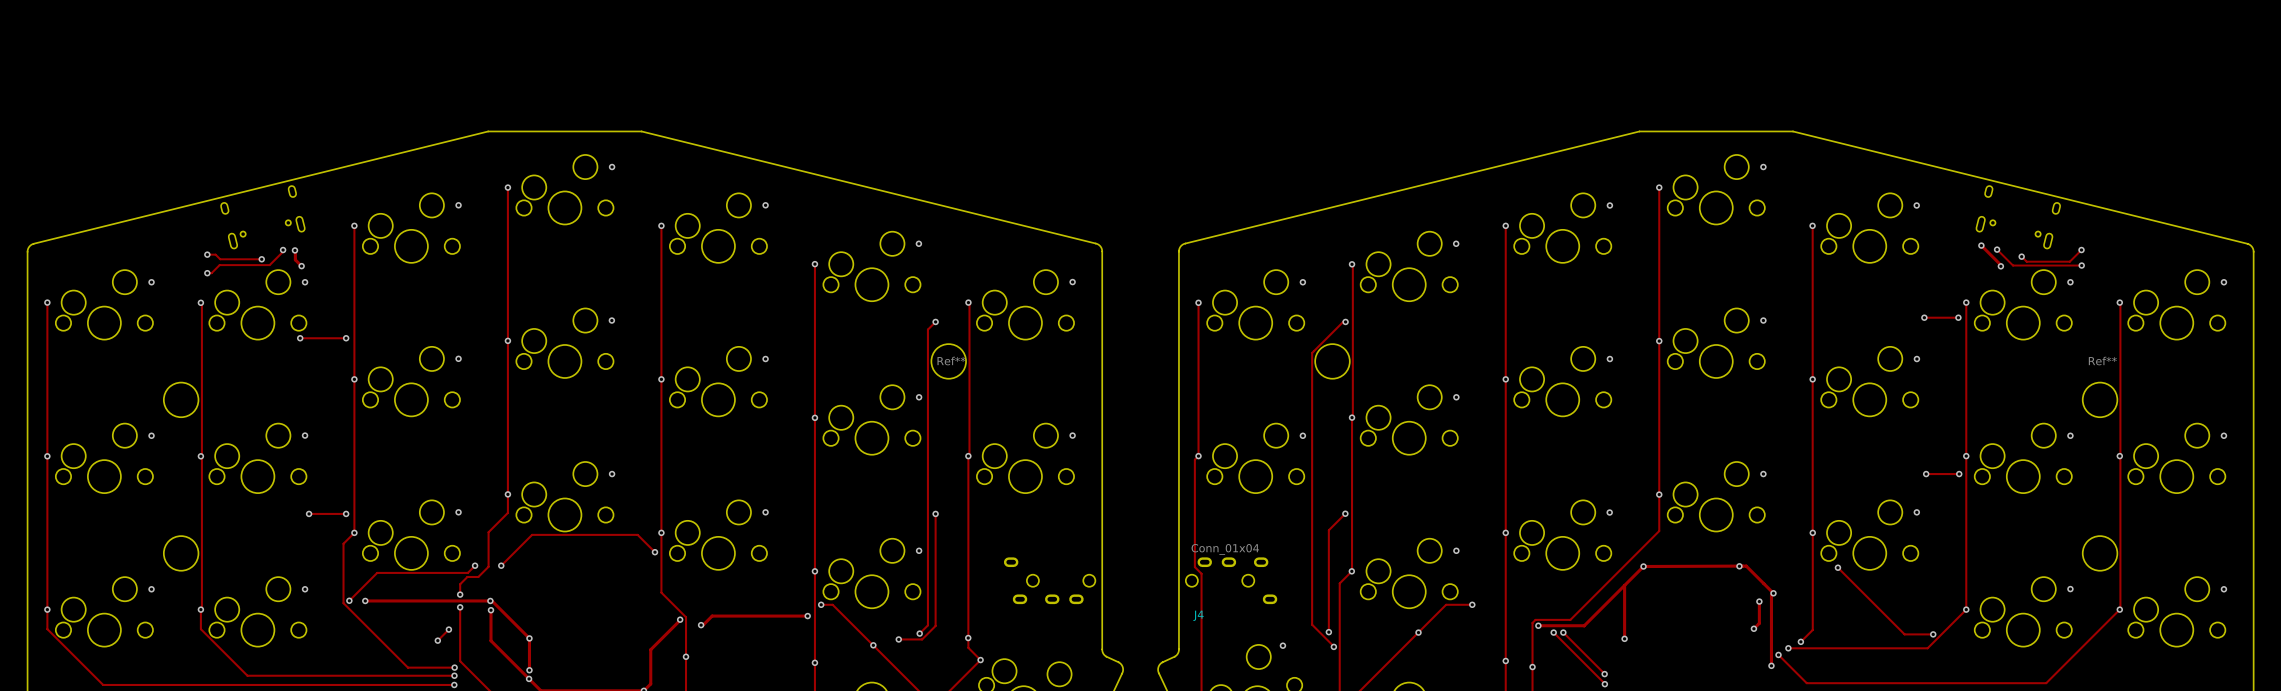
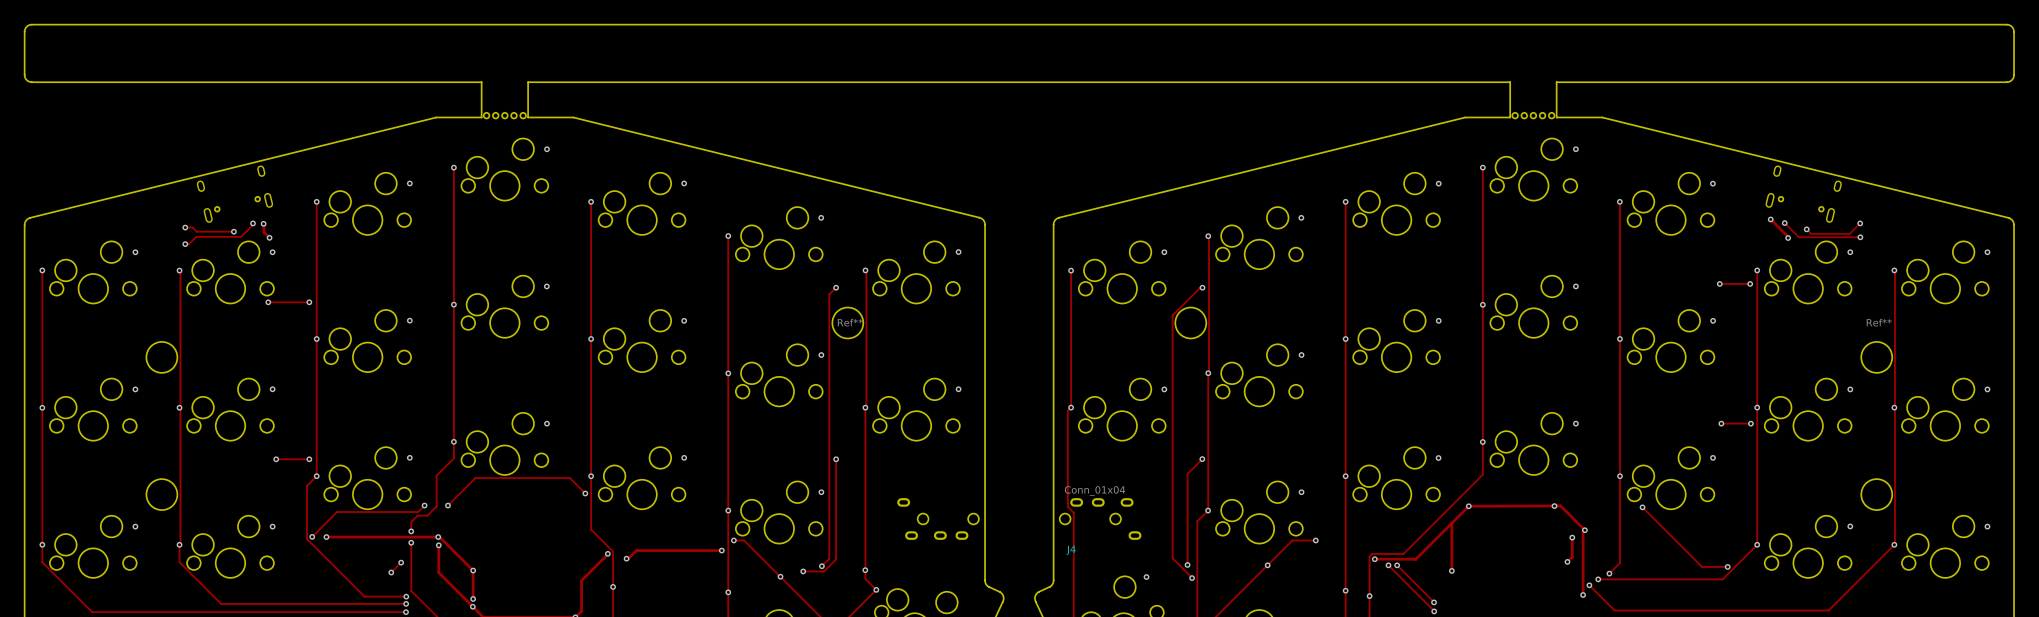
part: none -> (504, 115)
part: none -> (1533, 115)
board edge: (538, 131) (590, 131) -> (481, 117) (481, 82) (30, 82) (26, 80) (24, 75) (24, 30) (27, 26) (31, 24) (2006, 24) (2011, 26) (2013, 30) (2013, 75) (2011, 80) (2007, 82) (1556, 82) (1556, 117)
board edge: (1689, 131) (1741, 131) -> (1510, 117) (1510, 82) (528, 82) (528, 117)

